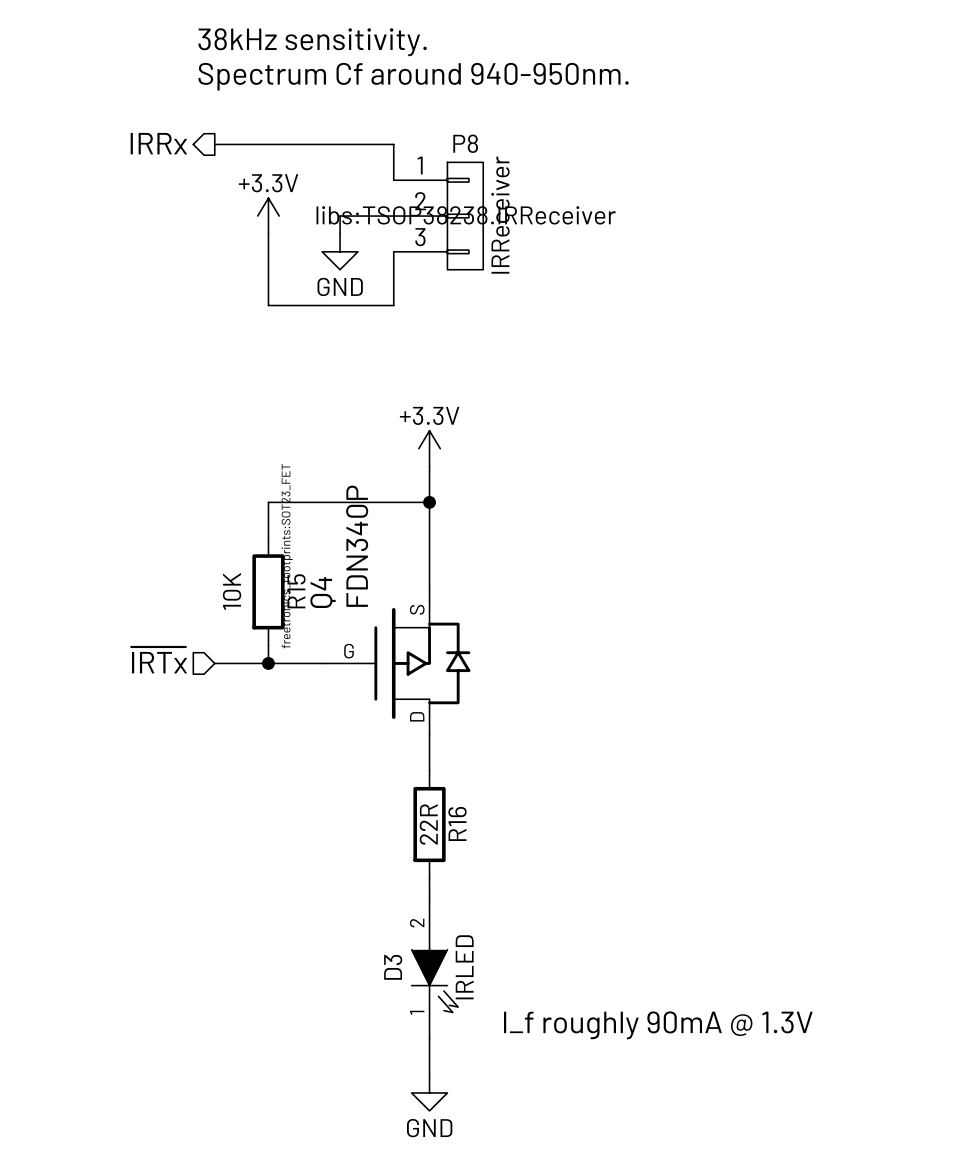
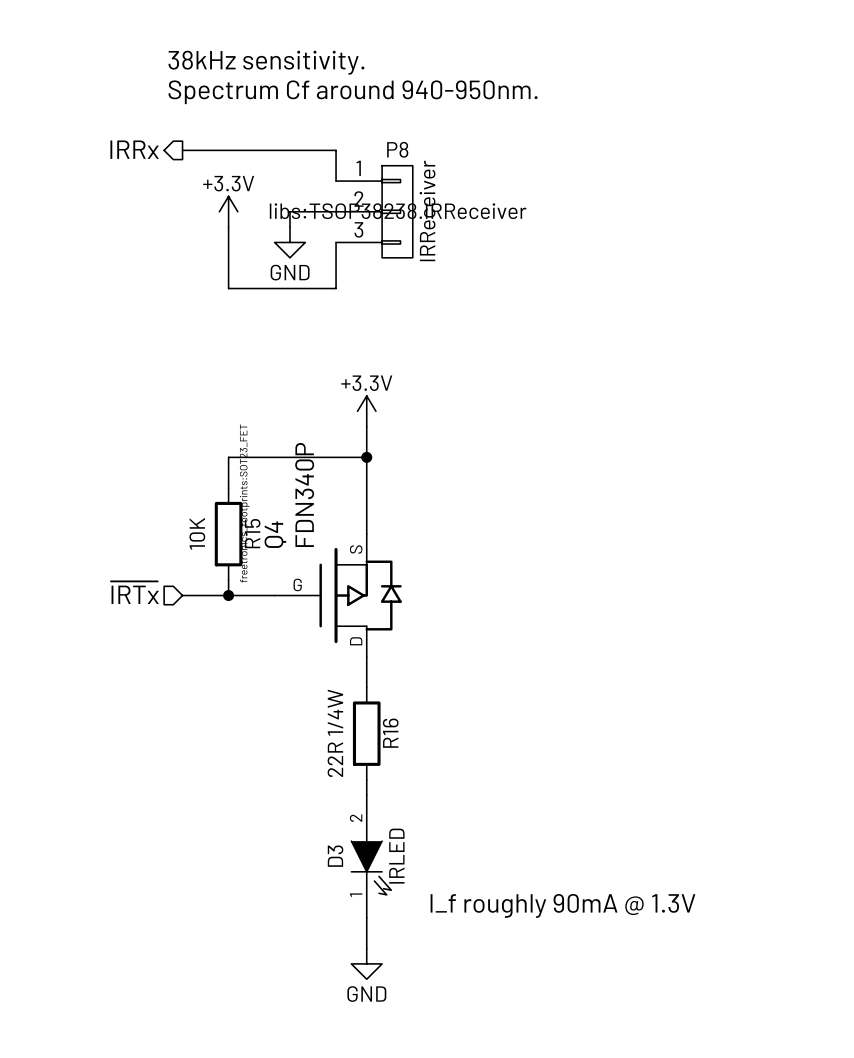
R16 value: 22R (428, 824) -> 22R 1/4W (335, 733)

